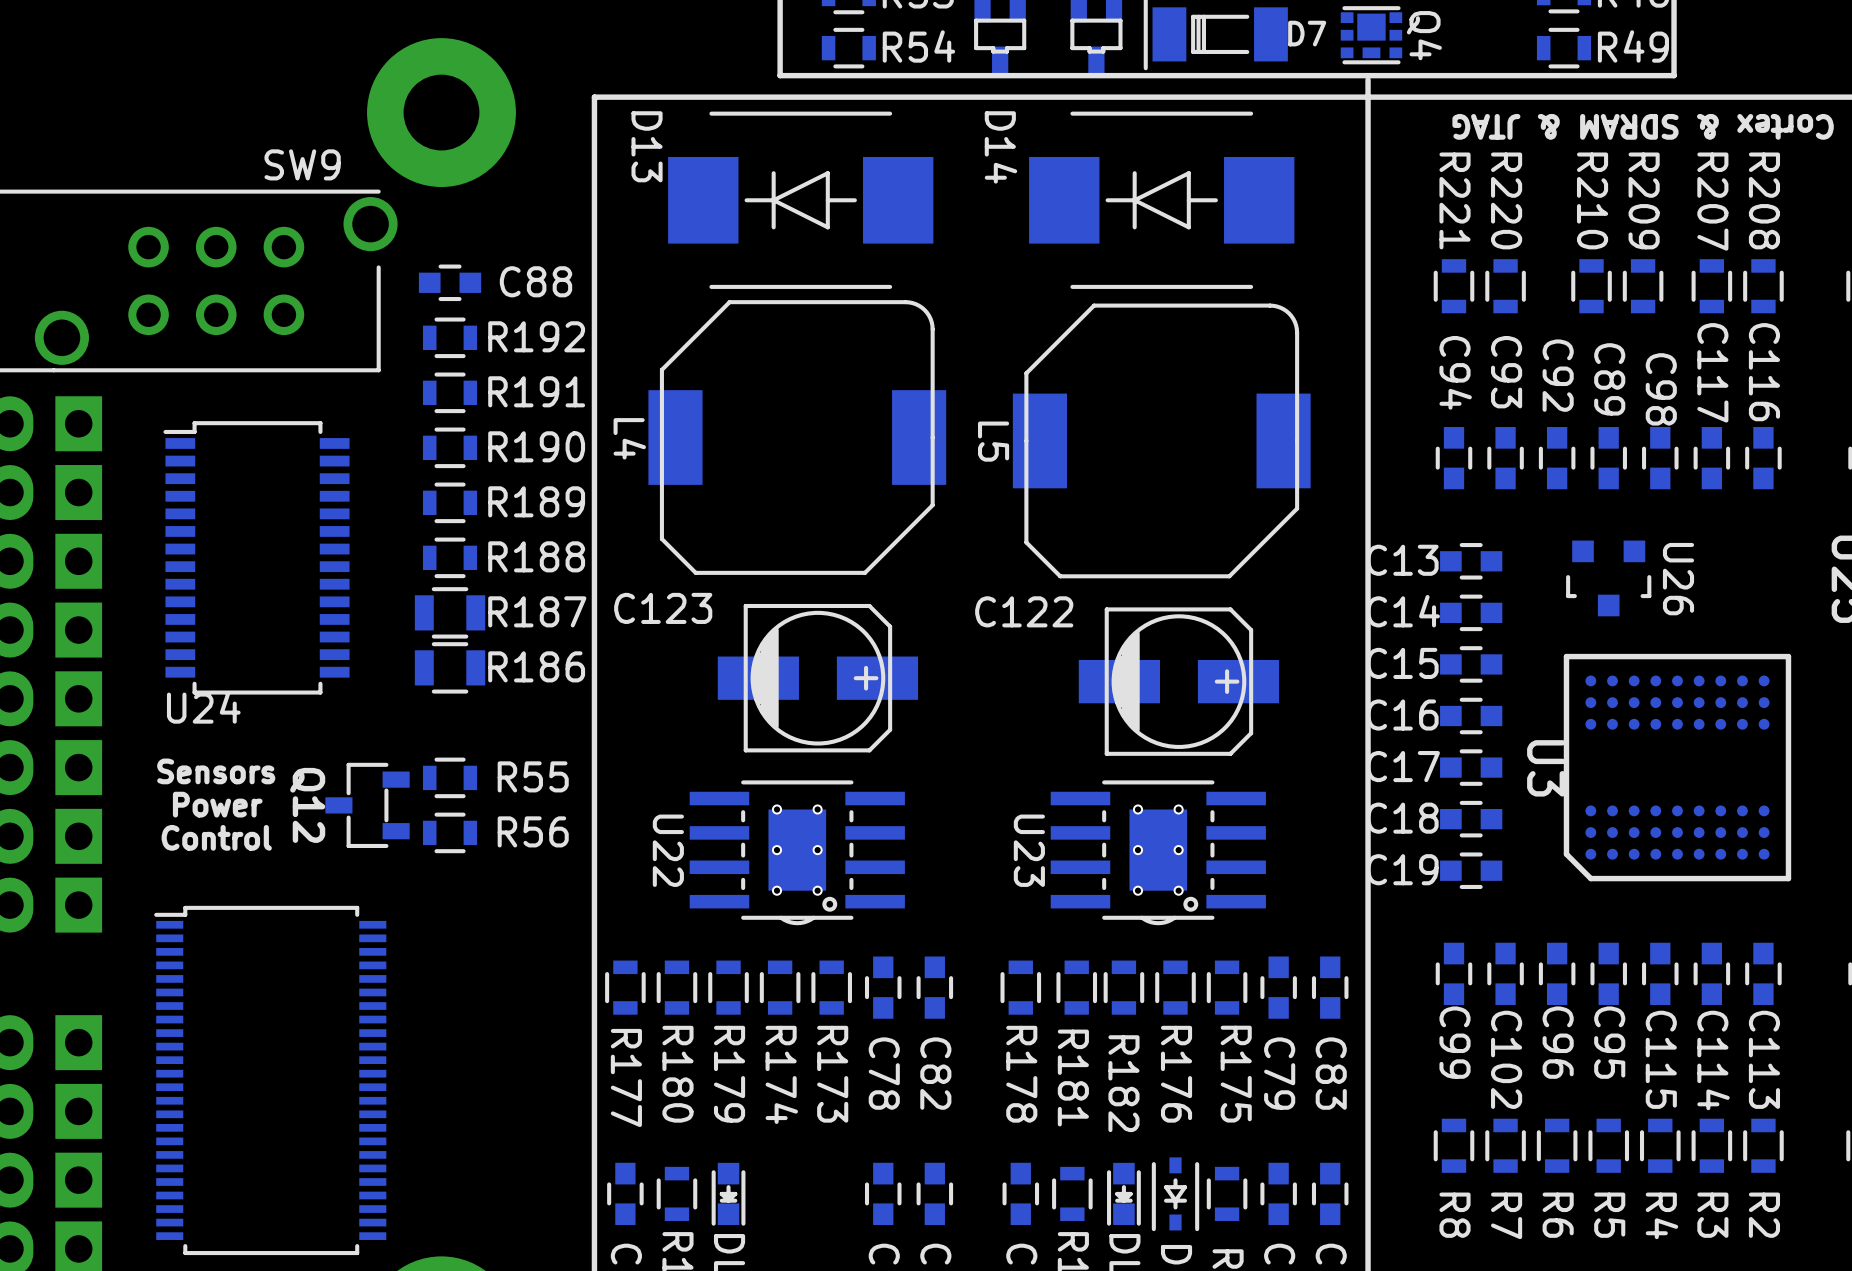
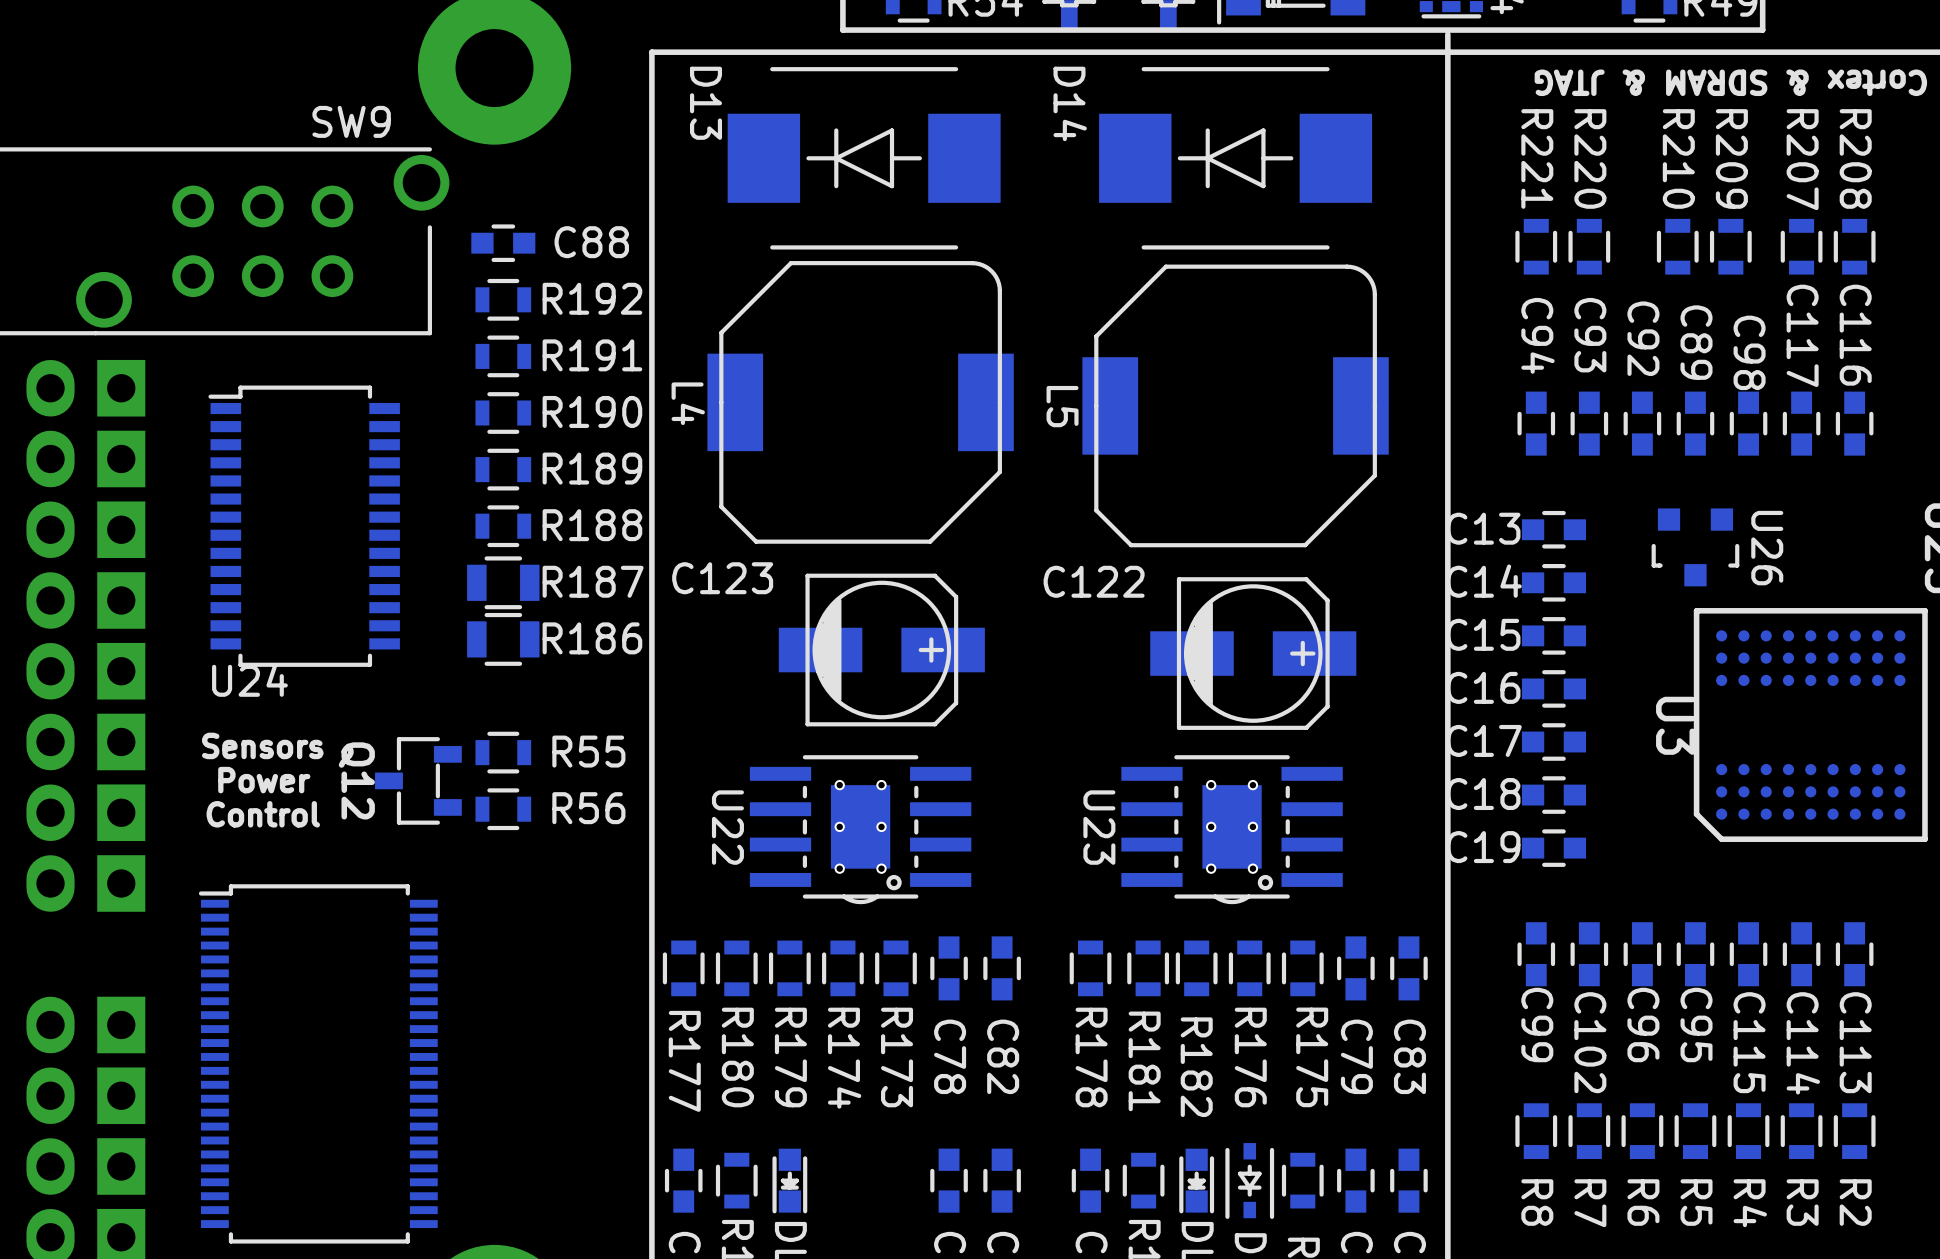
U3 position: (1677, 767) -> (1810, 725)

